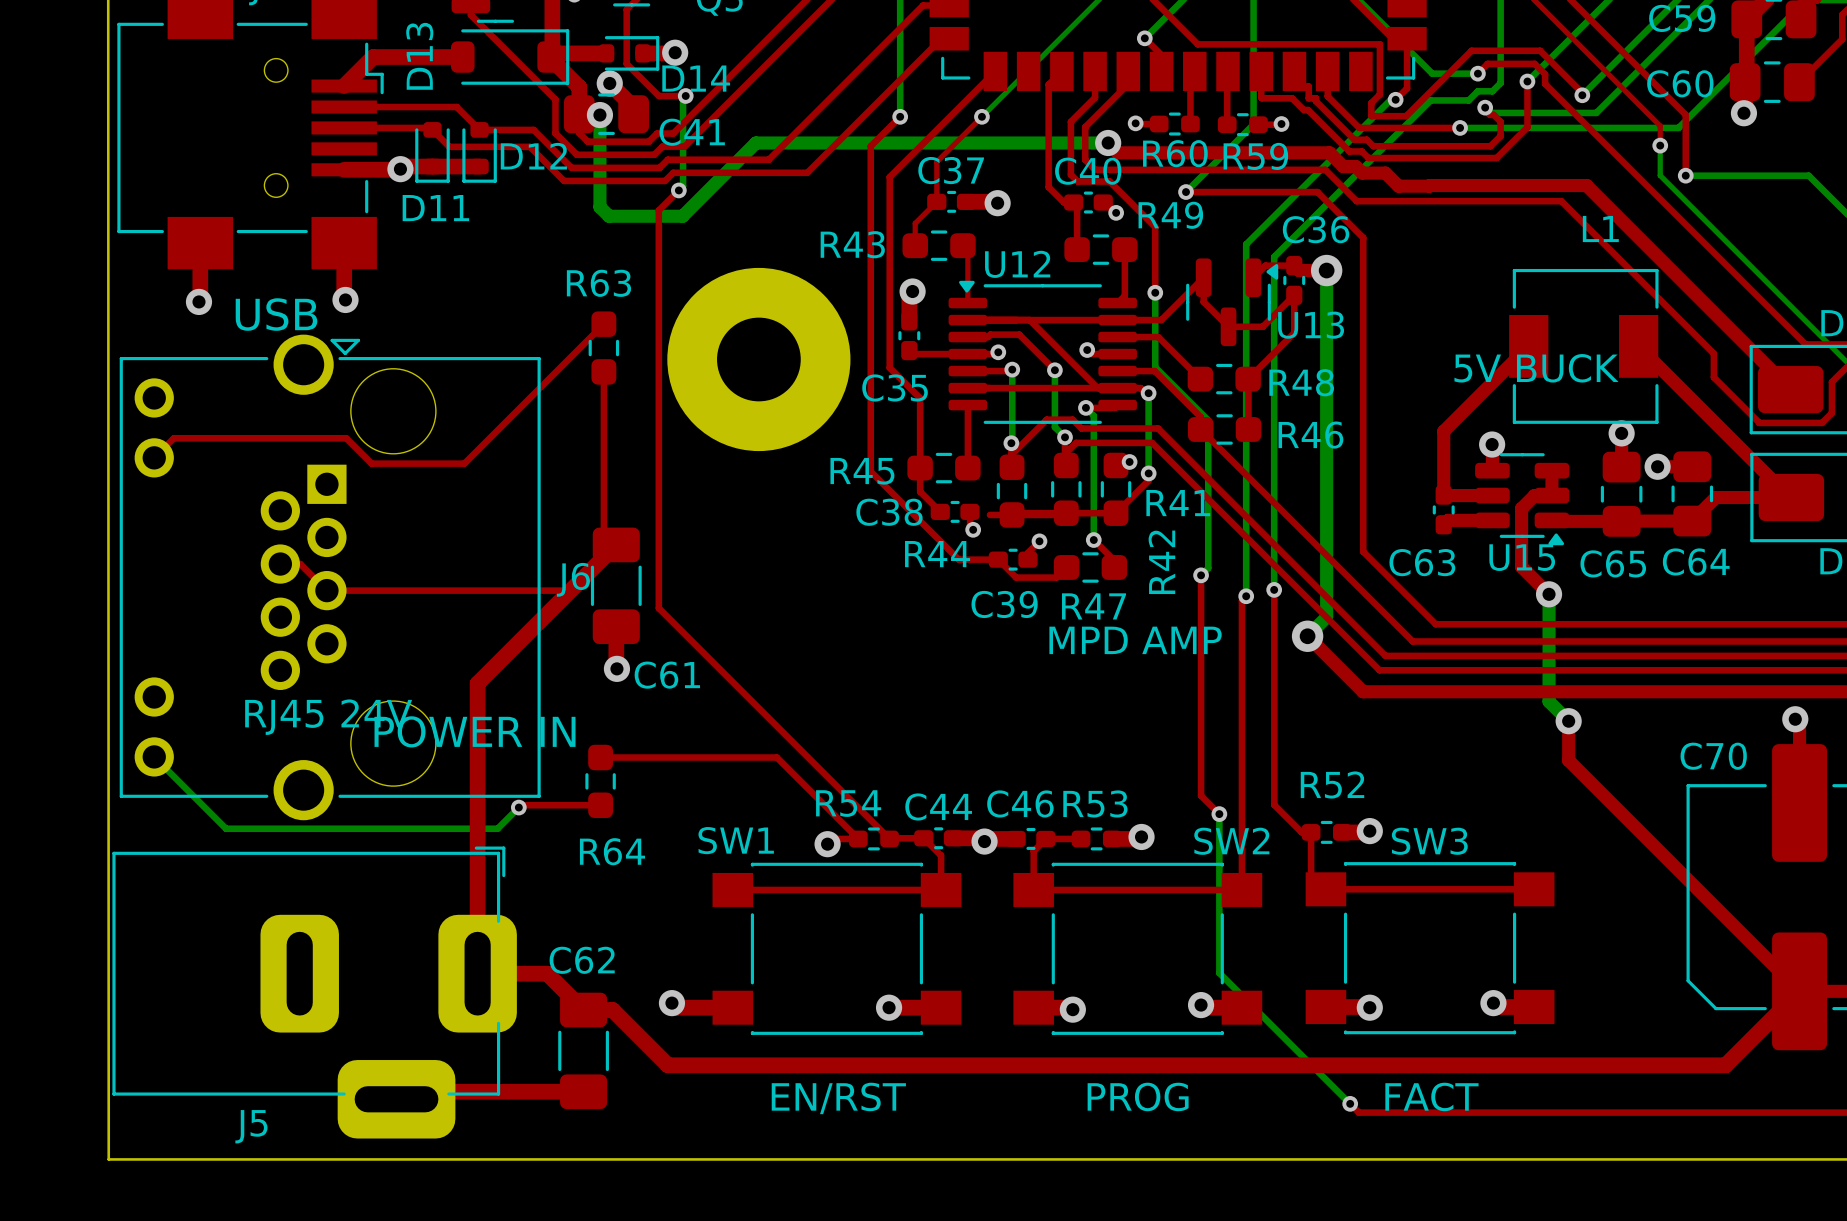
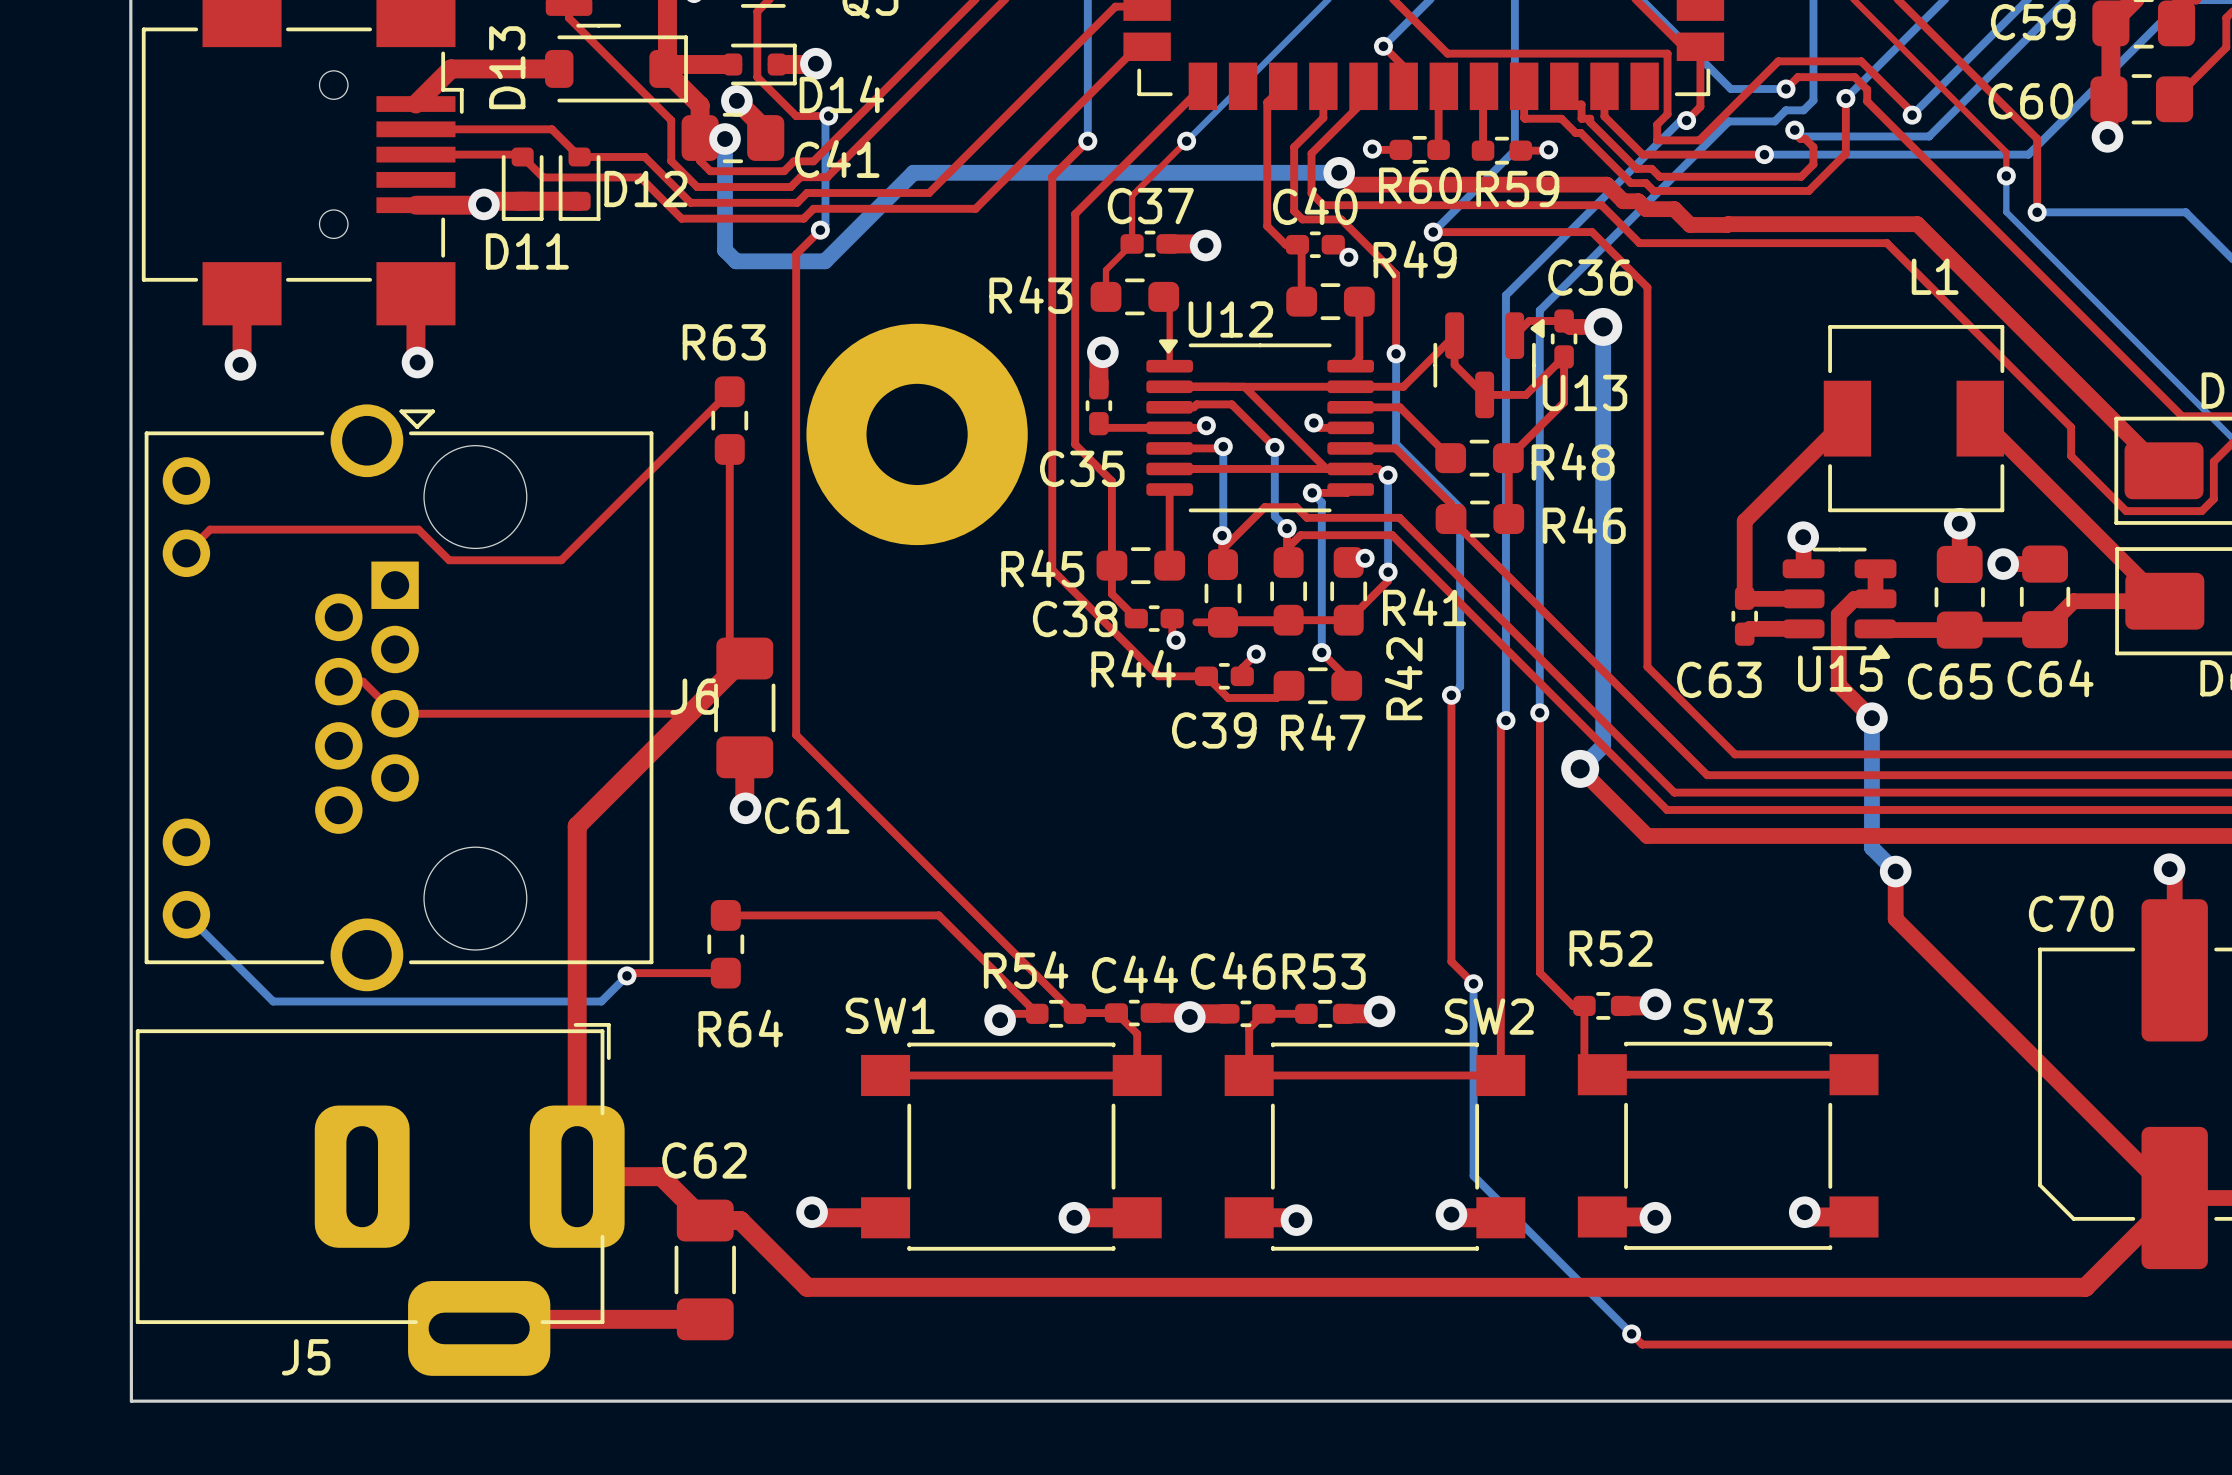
text: USB (276, 314) -> none
text: 5V BUCK (1536, 368) -> none
text: MPD AMP (1135, 640) -> none
text: RJ45 24V (328, 717) -> none
text: POWER IN (475, 731) -> none
text: PROG (1138, 1096) -> none
text: FACT (1431, 1096) -> none
text: EN/RST (838, 1098) -> none

